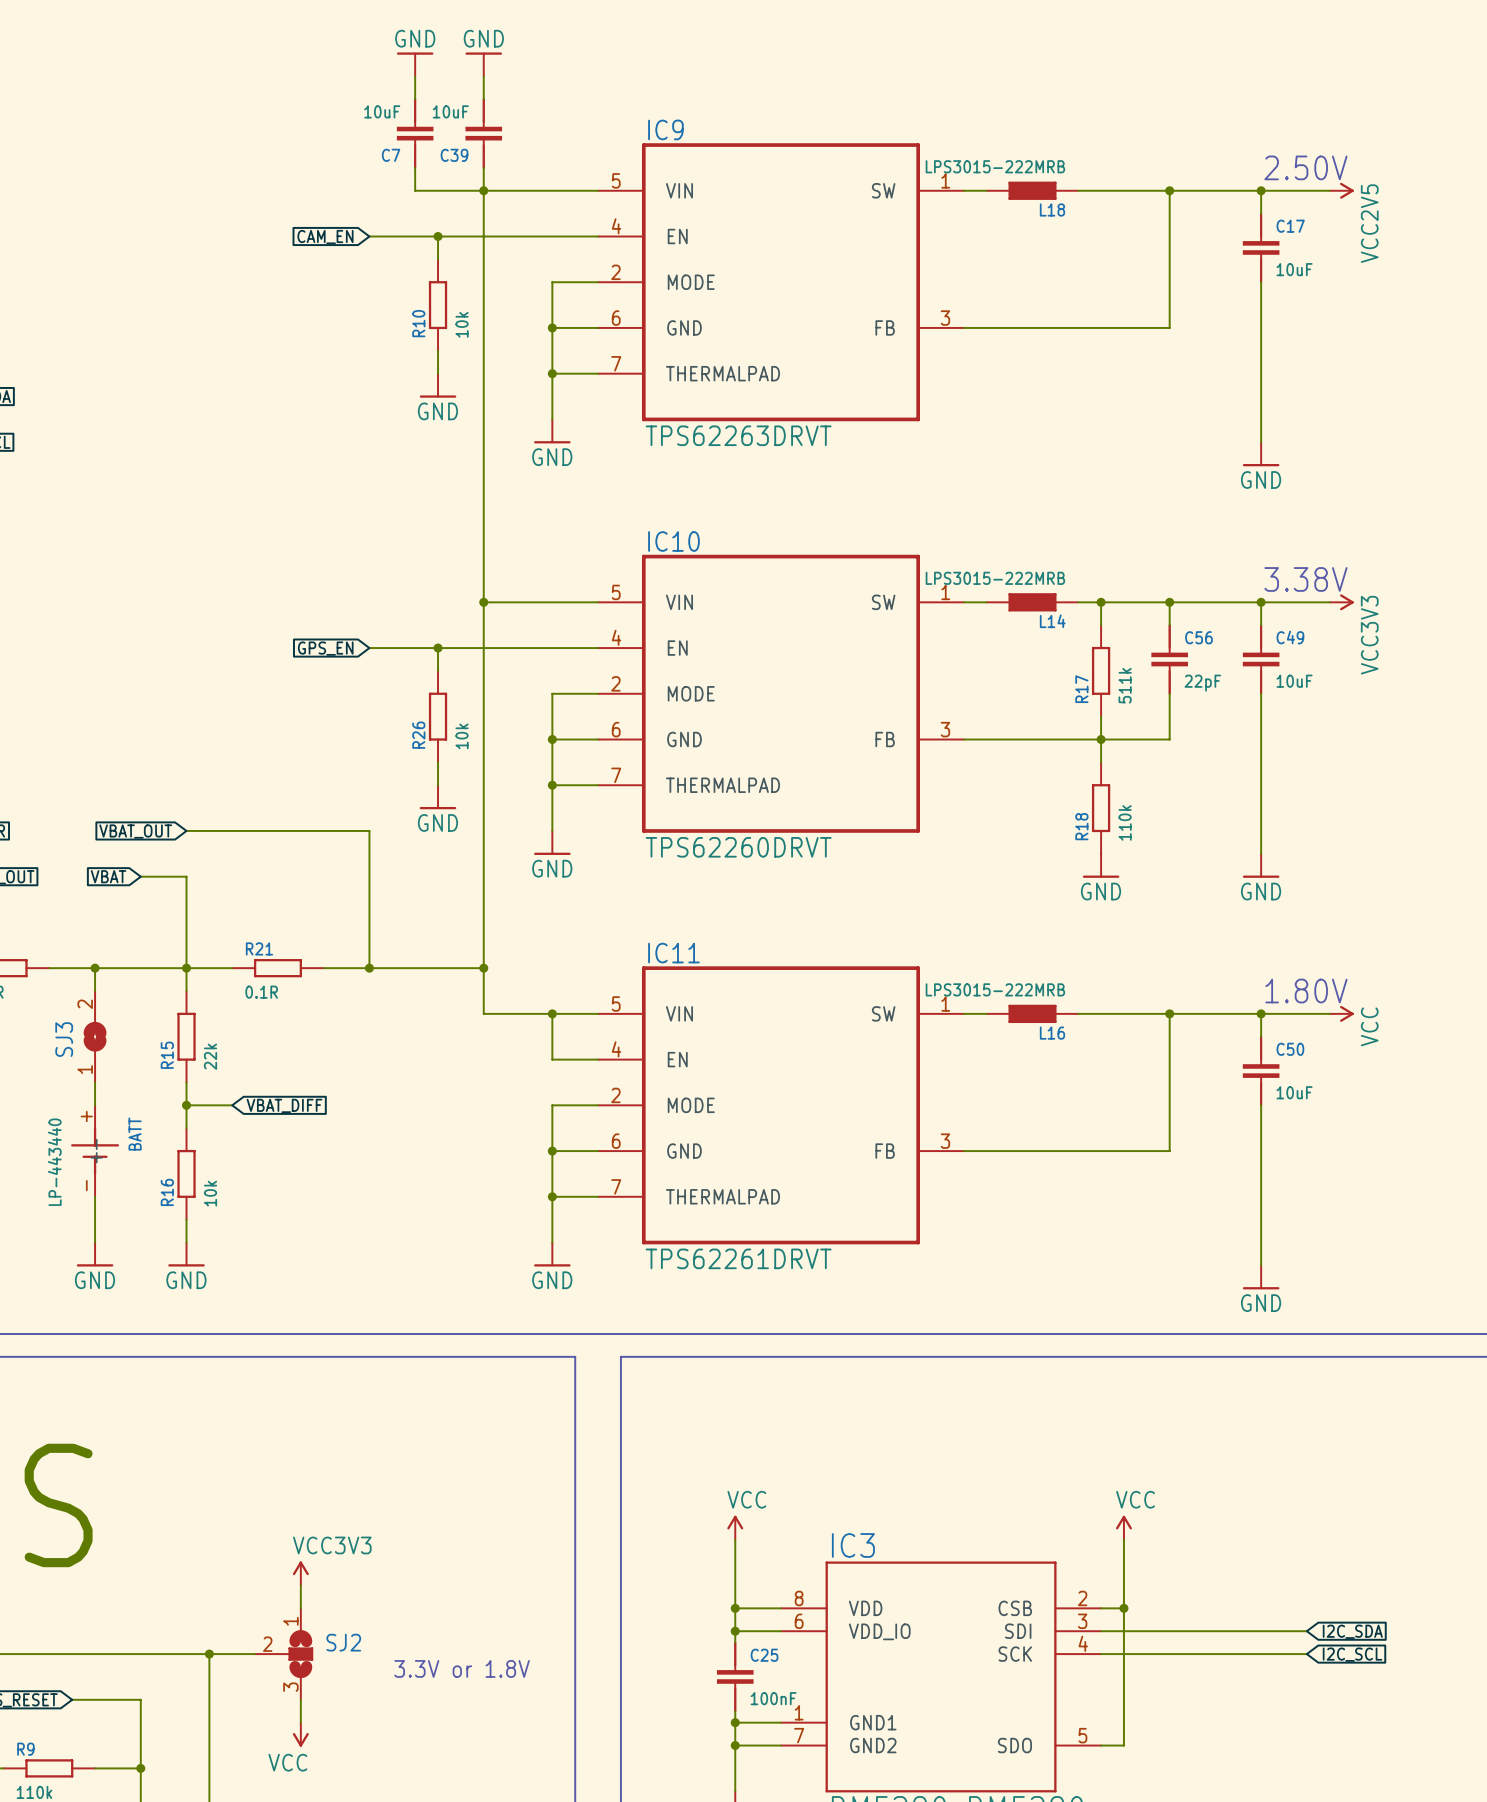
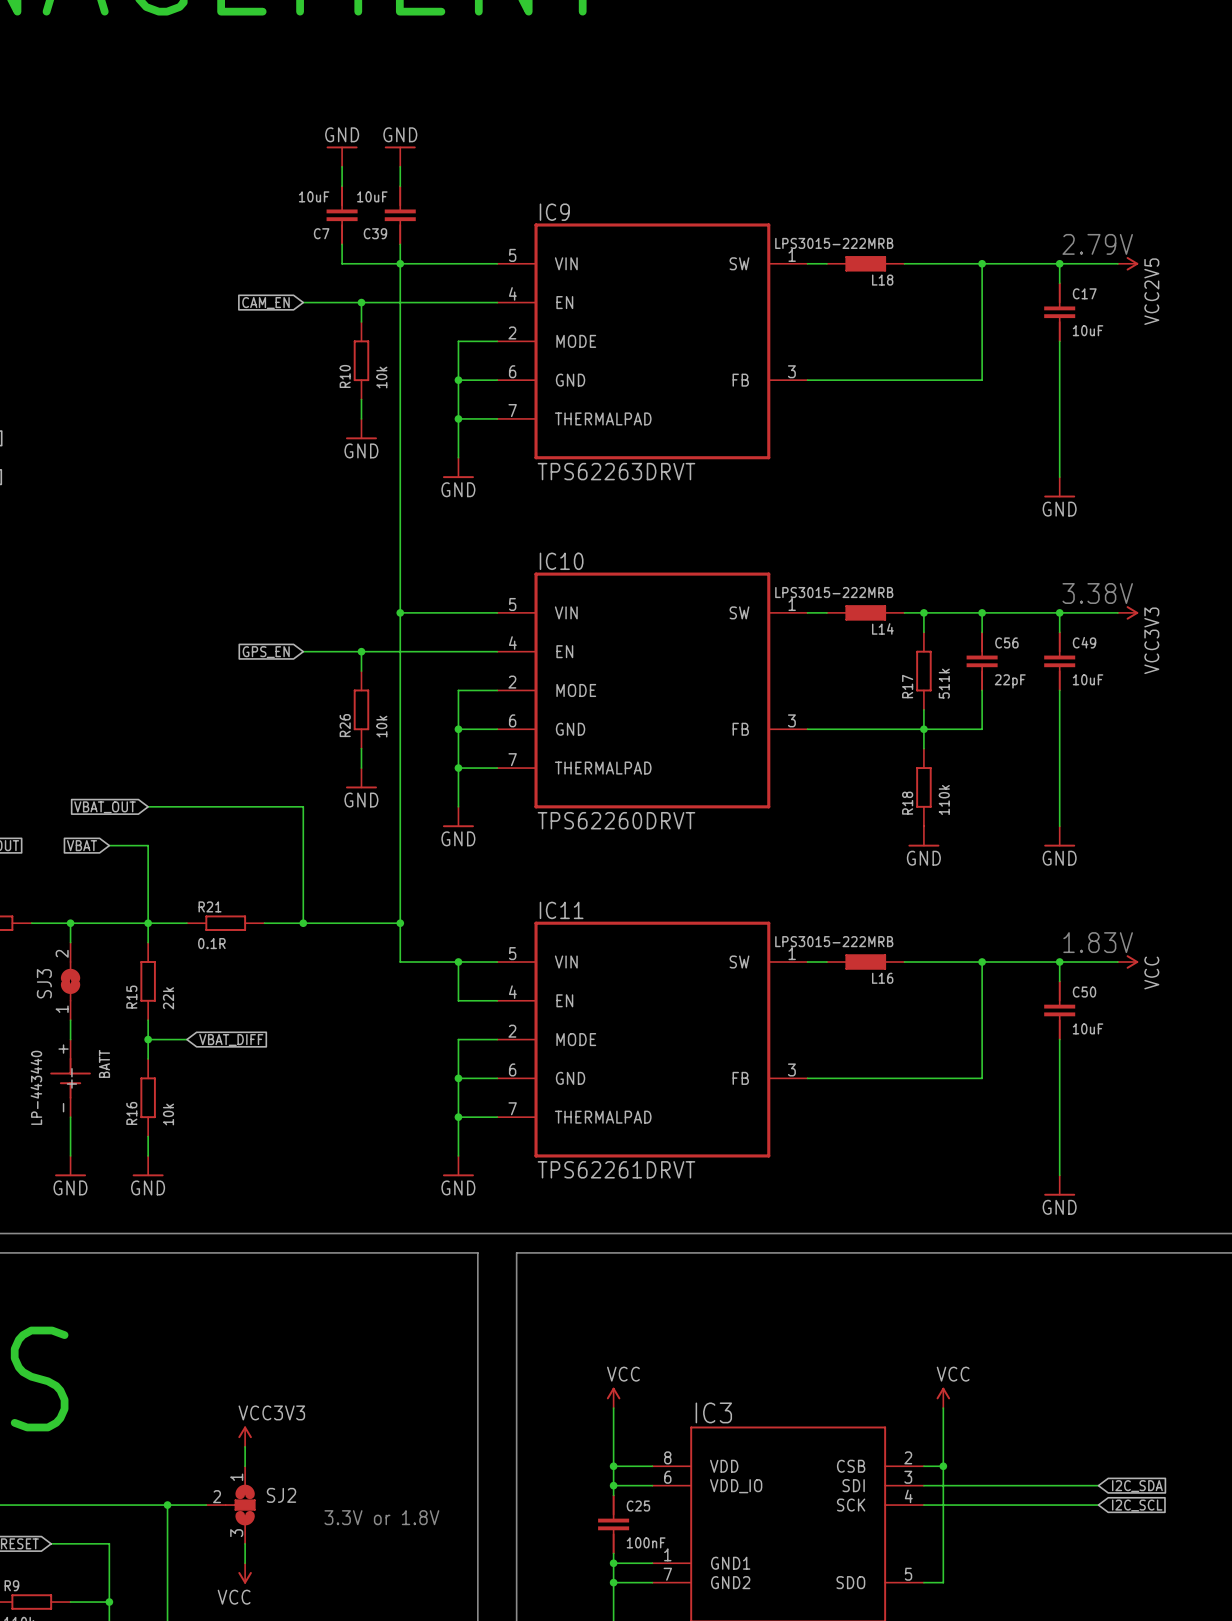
text: 2.50V (1305, 167) -> 2.79V (1097, 244)
text: 1.80V (1306, 991) -> 1.83V (1098, 942)

